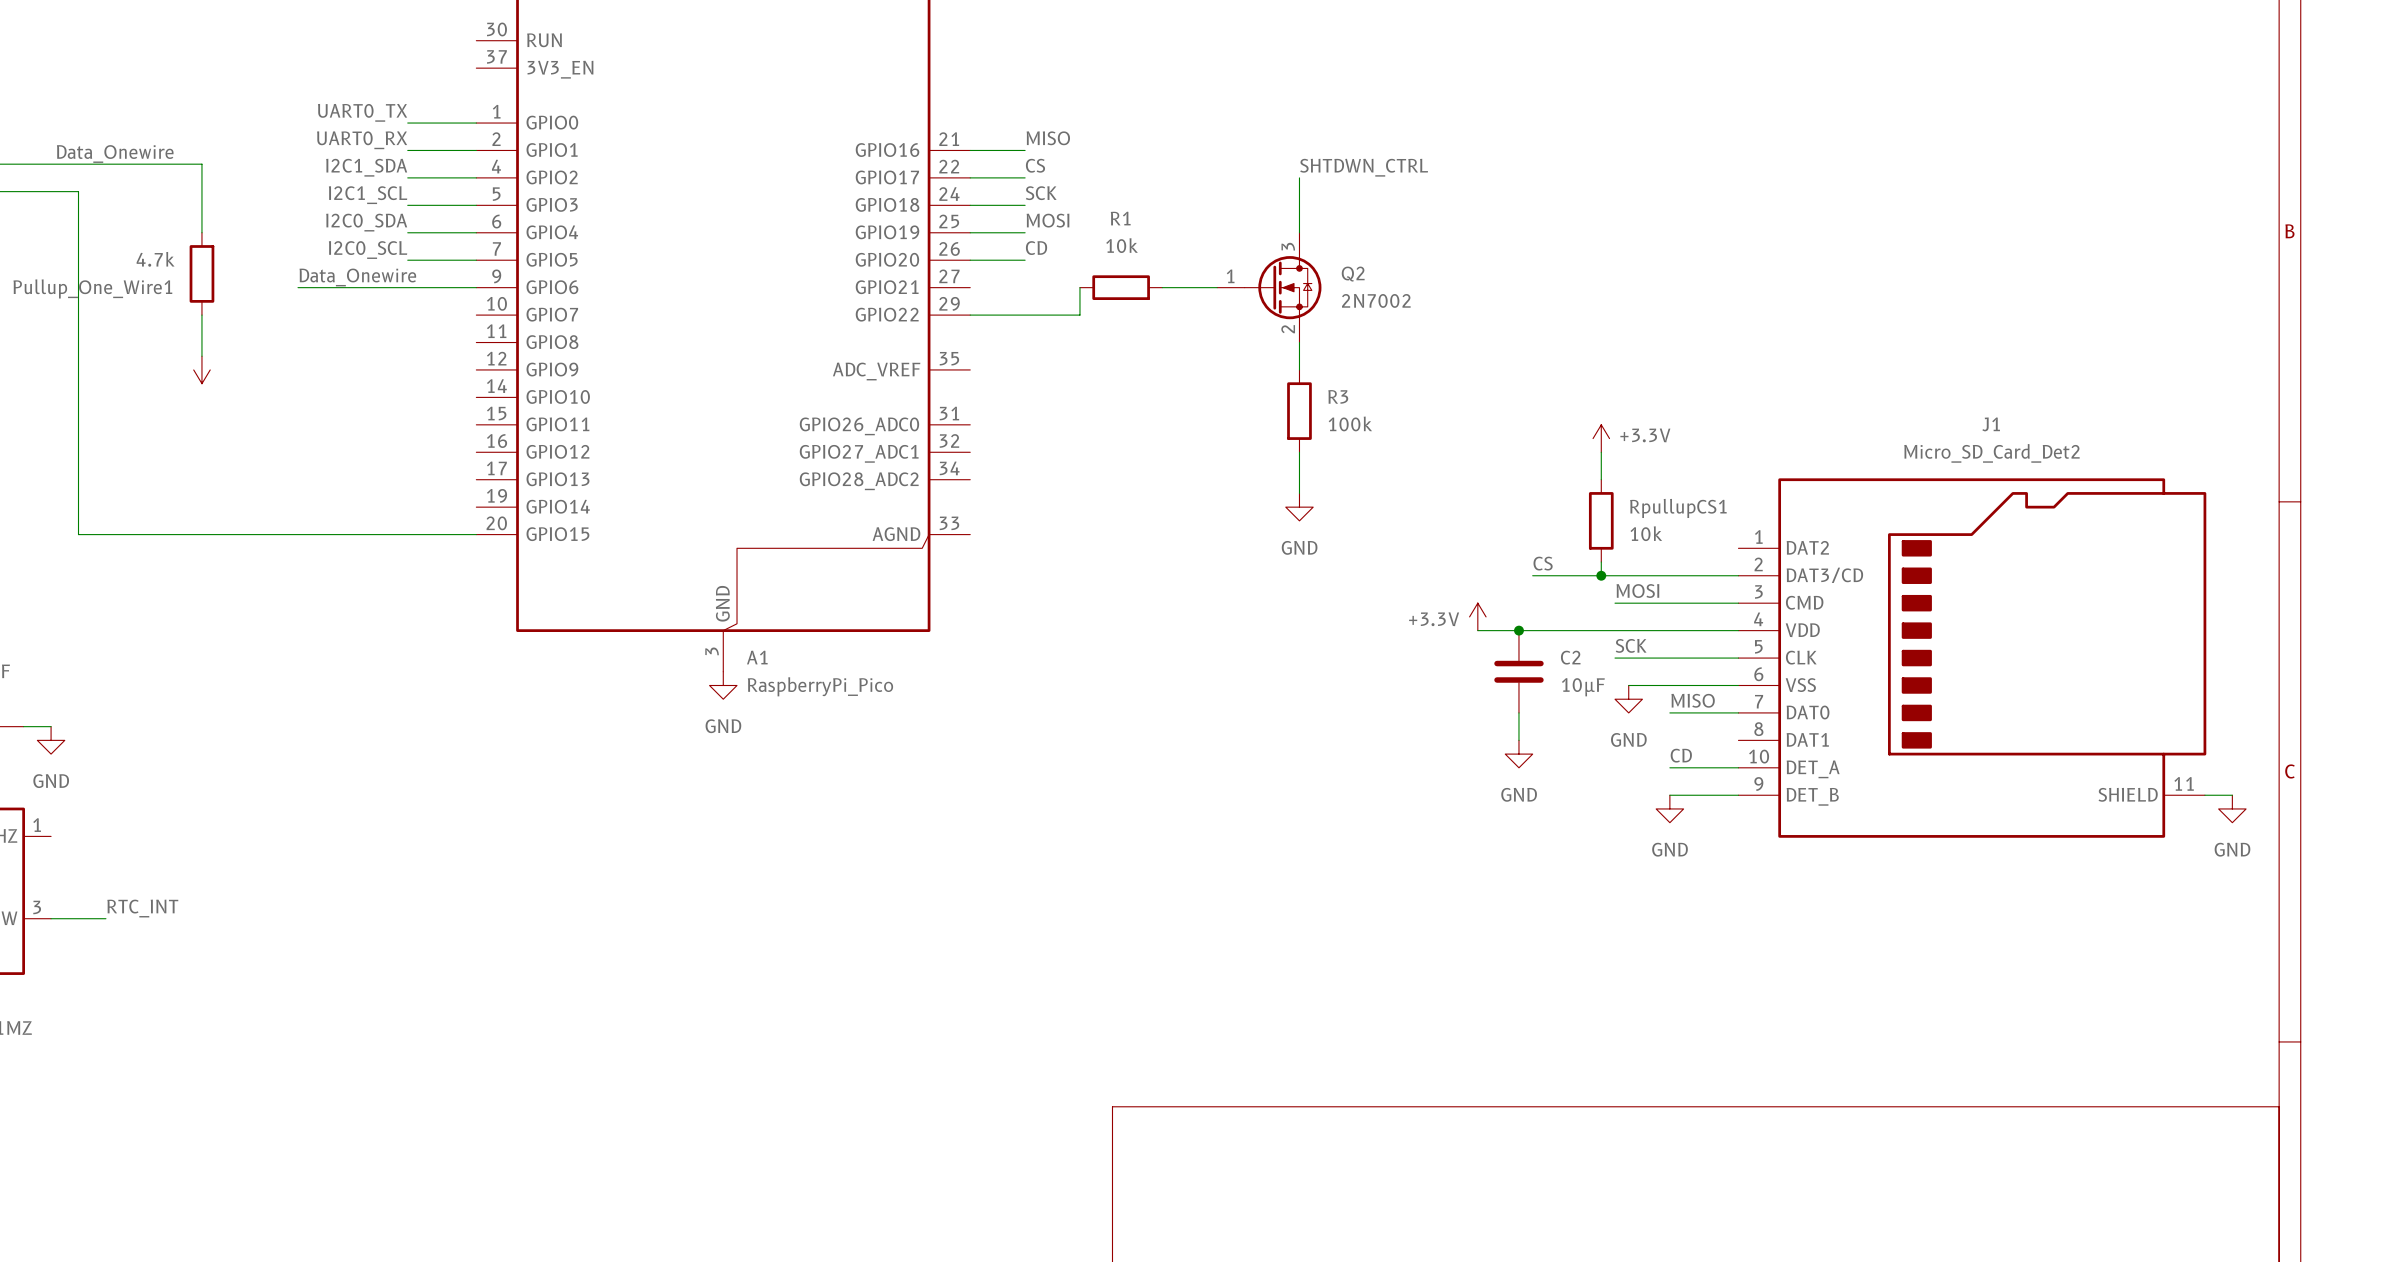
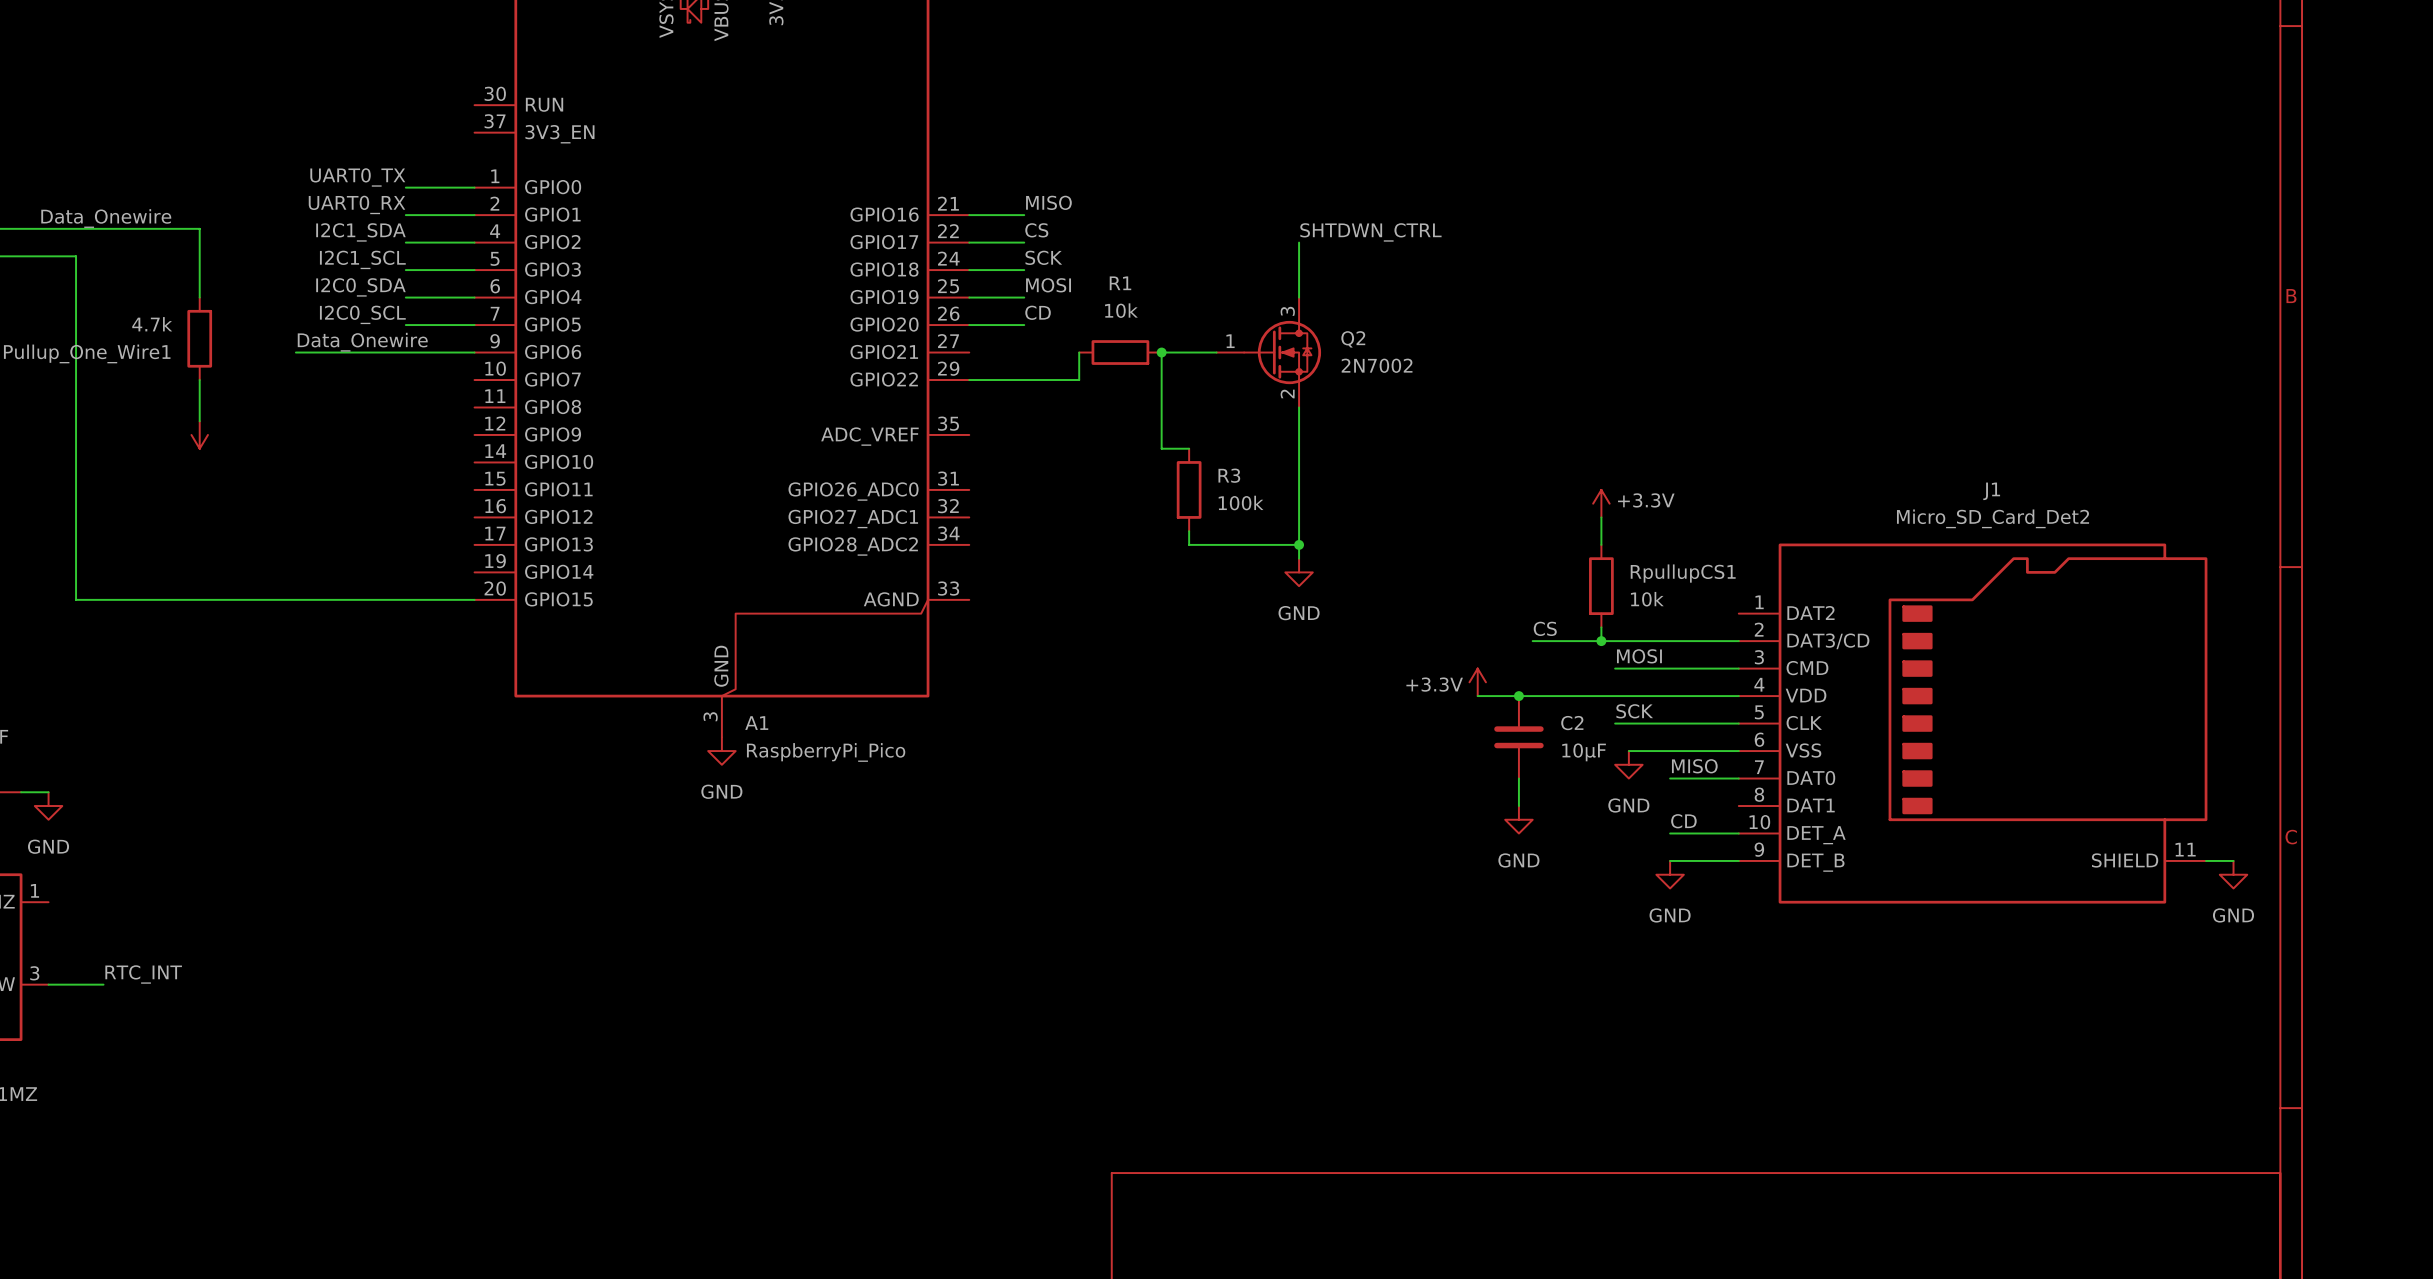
wire: none -> (1161, 352) (1161, 448) (1189, 448)
junction: none -> (1161, 352)
wire: none -> (1299, 434) (1299, 517)
R3 position: (1299, 411) -> (1189, 489)
wire: none -> (1189, 531) (1189, 544) (1299, 544)
junction: none -> (1299, 544)

